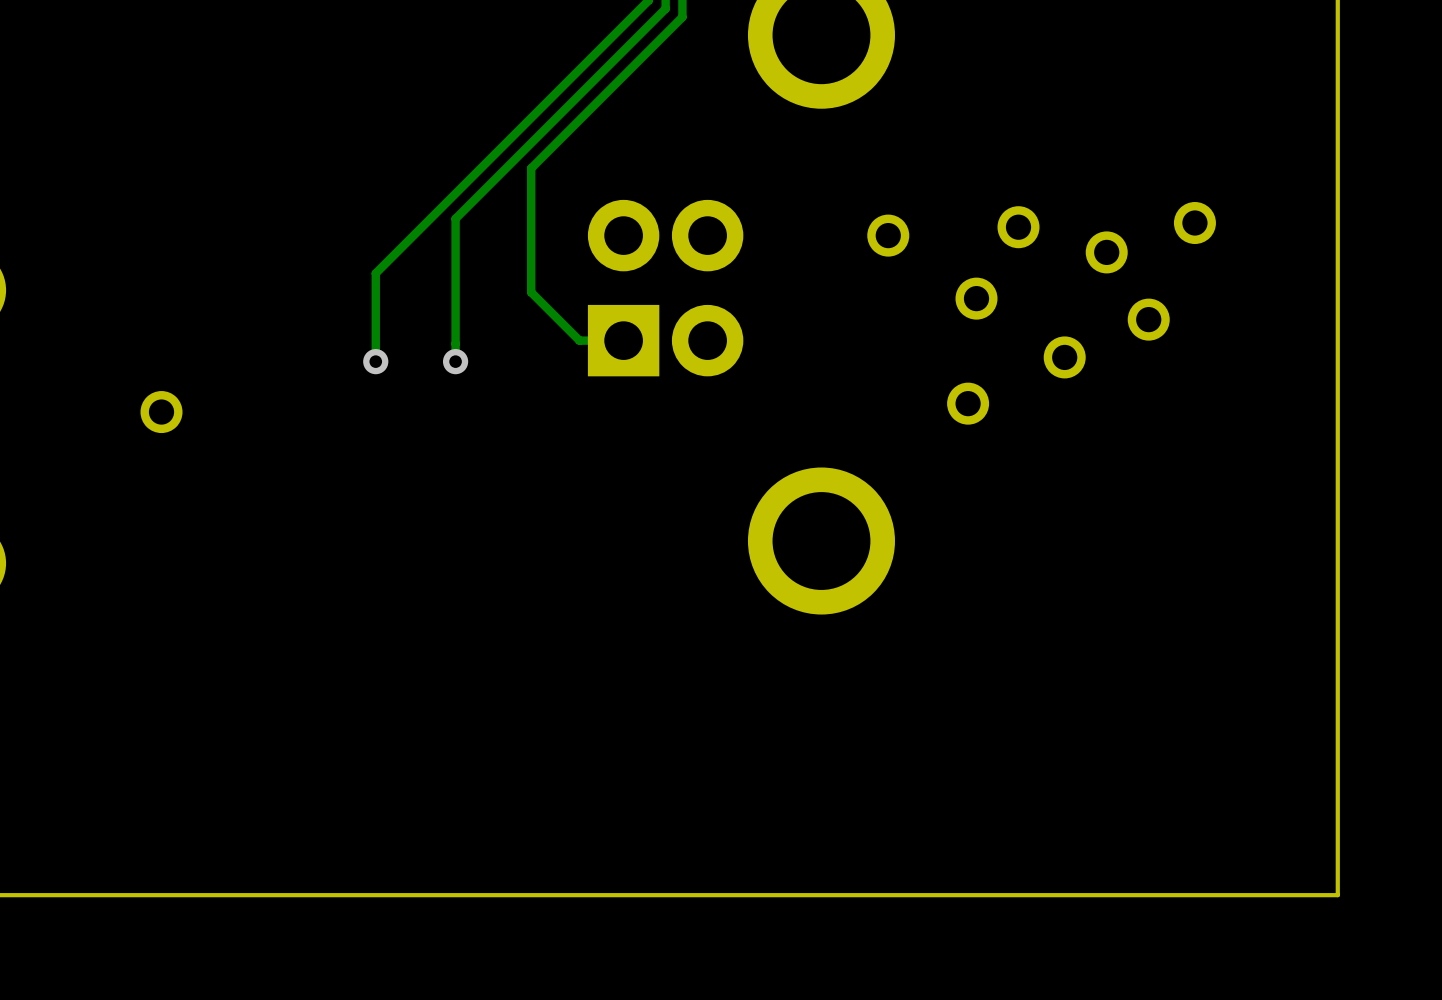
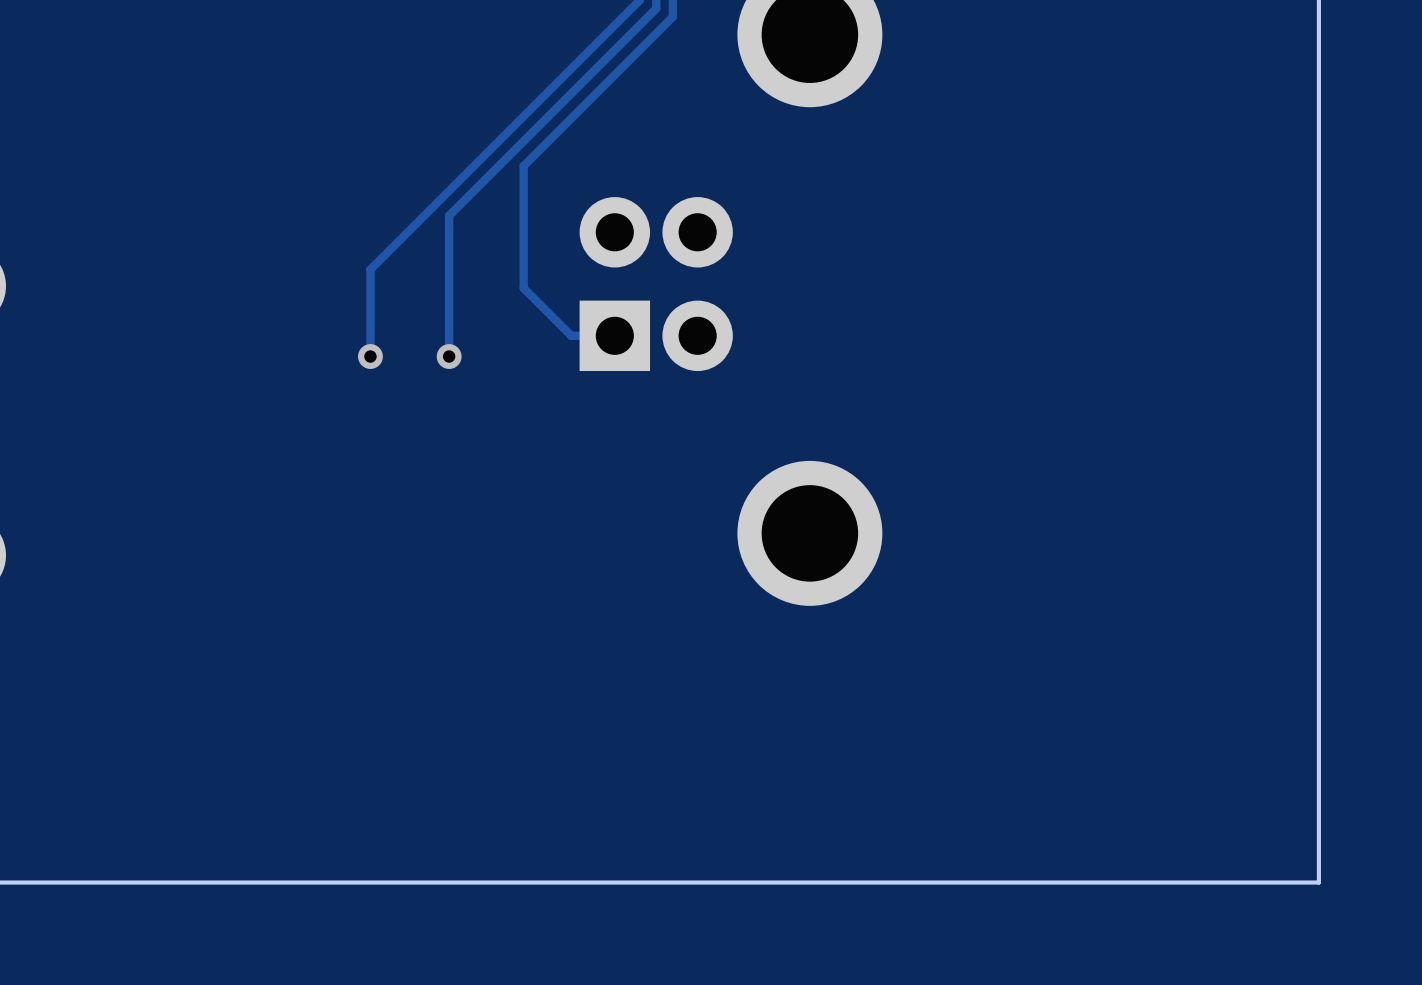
part: (1194, 223) -> none
part: (1018, 227) -> none
part: (888, 235) -> none
part: (1106, 252) -> none
part: (976, 298) -> none
part: (1148, 319) -> none
part: (1064, 357) -> none
part: (968, 403) -> none
part: (161, 412) -> none

